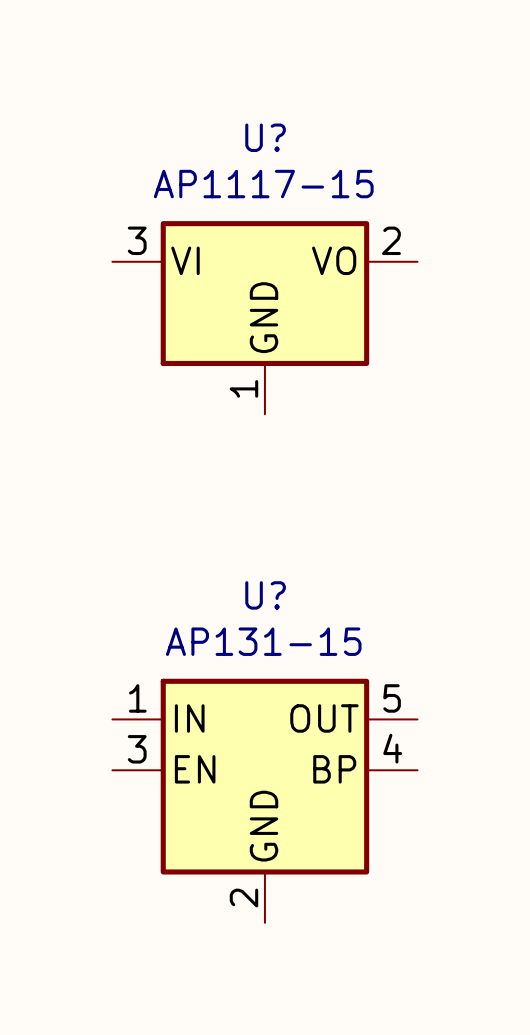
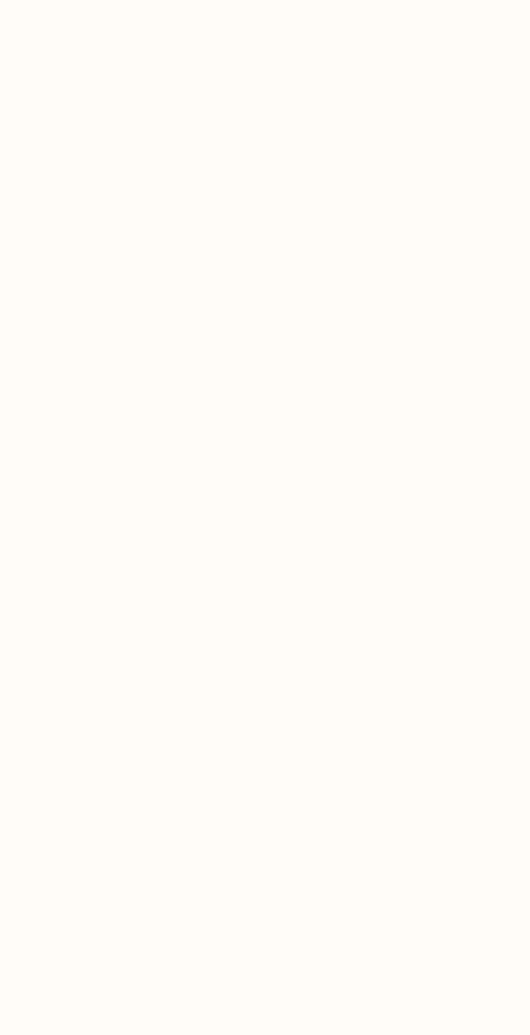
U?: AP1117-15 (264, 317) -> none
U?: AP131-15 (264, 800) -> none

